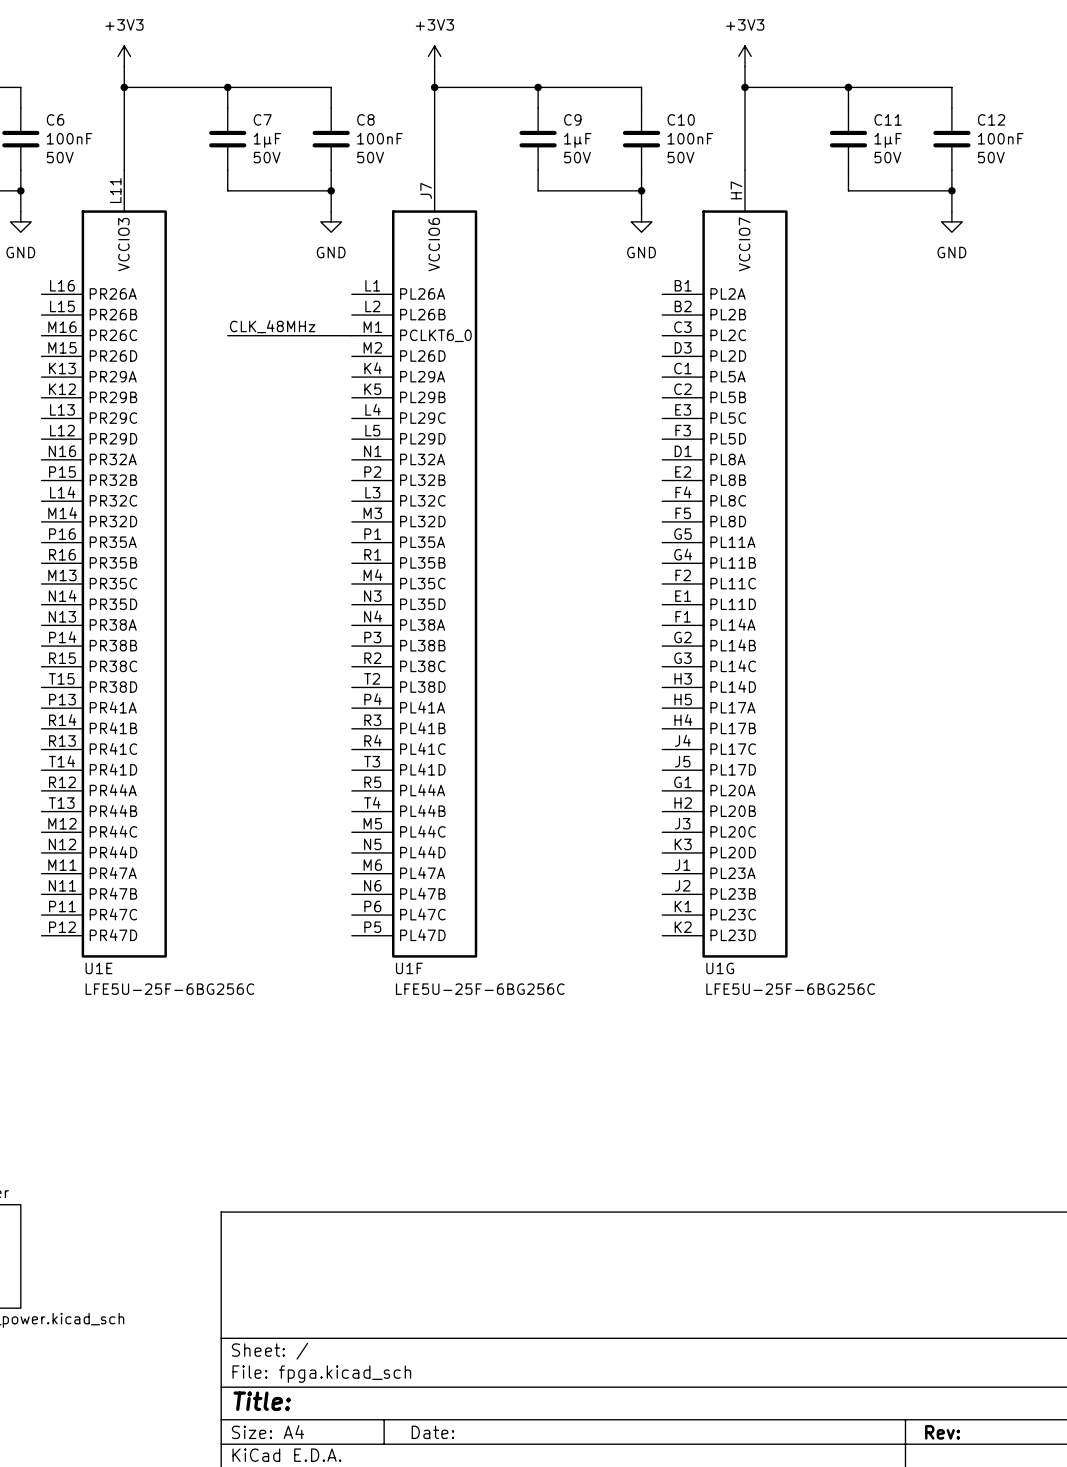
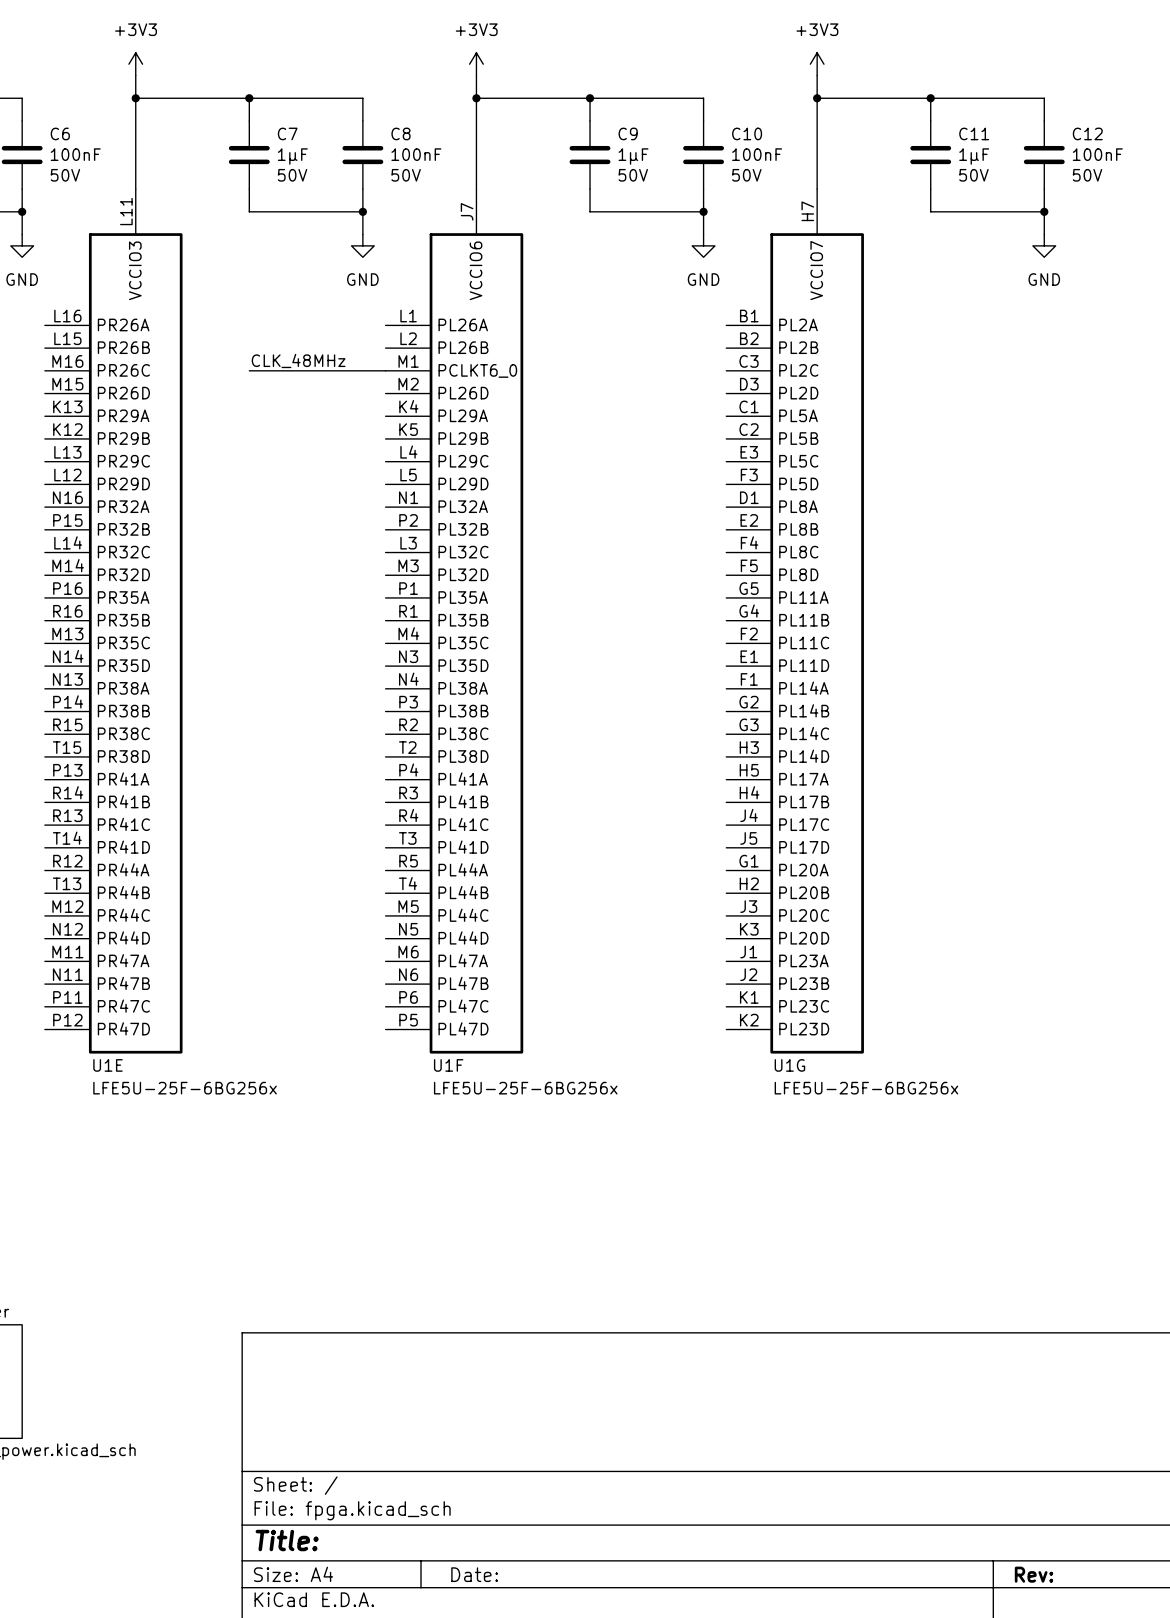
U1E value: LFE5U-25F-6BG256C (169, 989) -> LFE5U-25F-6BG256x (185, 1088)
U1F value: LFE5U-25F-6BG256C (480, 989) -> LFE5U-25F-6BG256x (525, 1088)
U1G value: LFE5U-25F-6BG256C (790, 989) -> LFE5U-25F-6BG256x (866, 1088)

